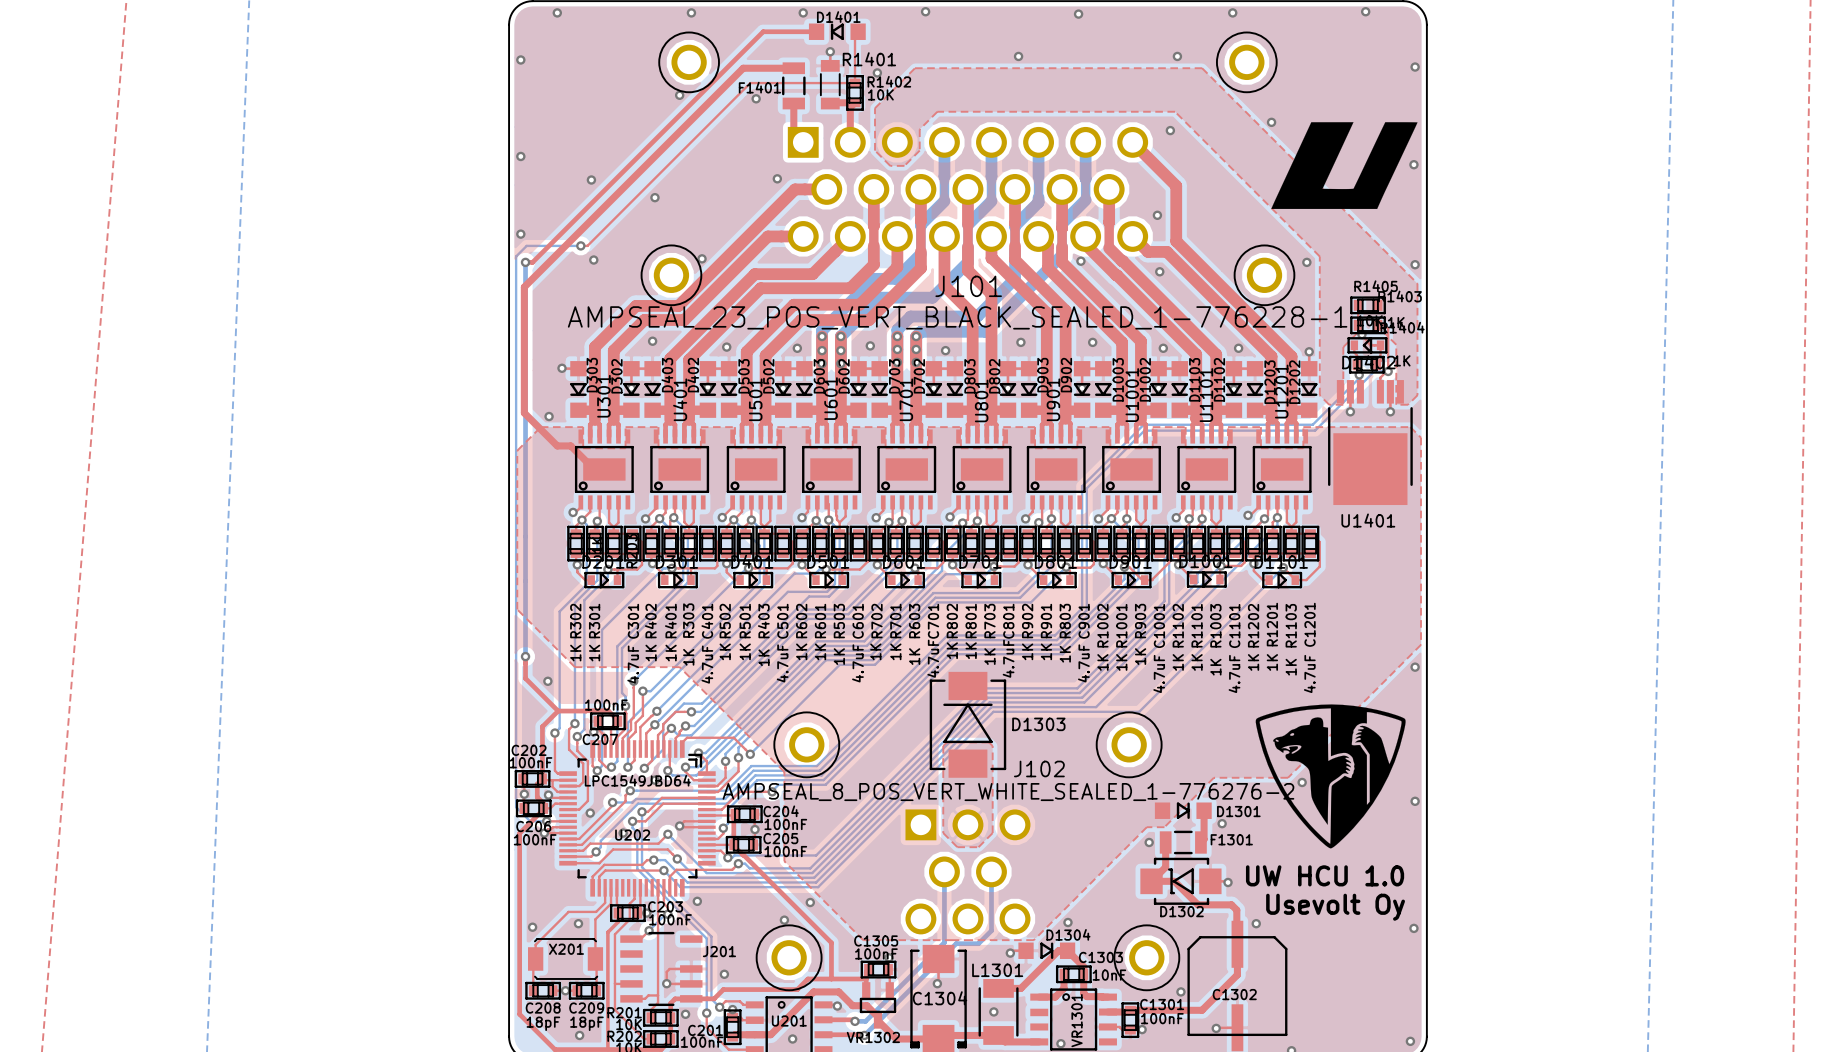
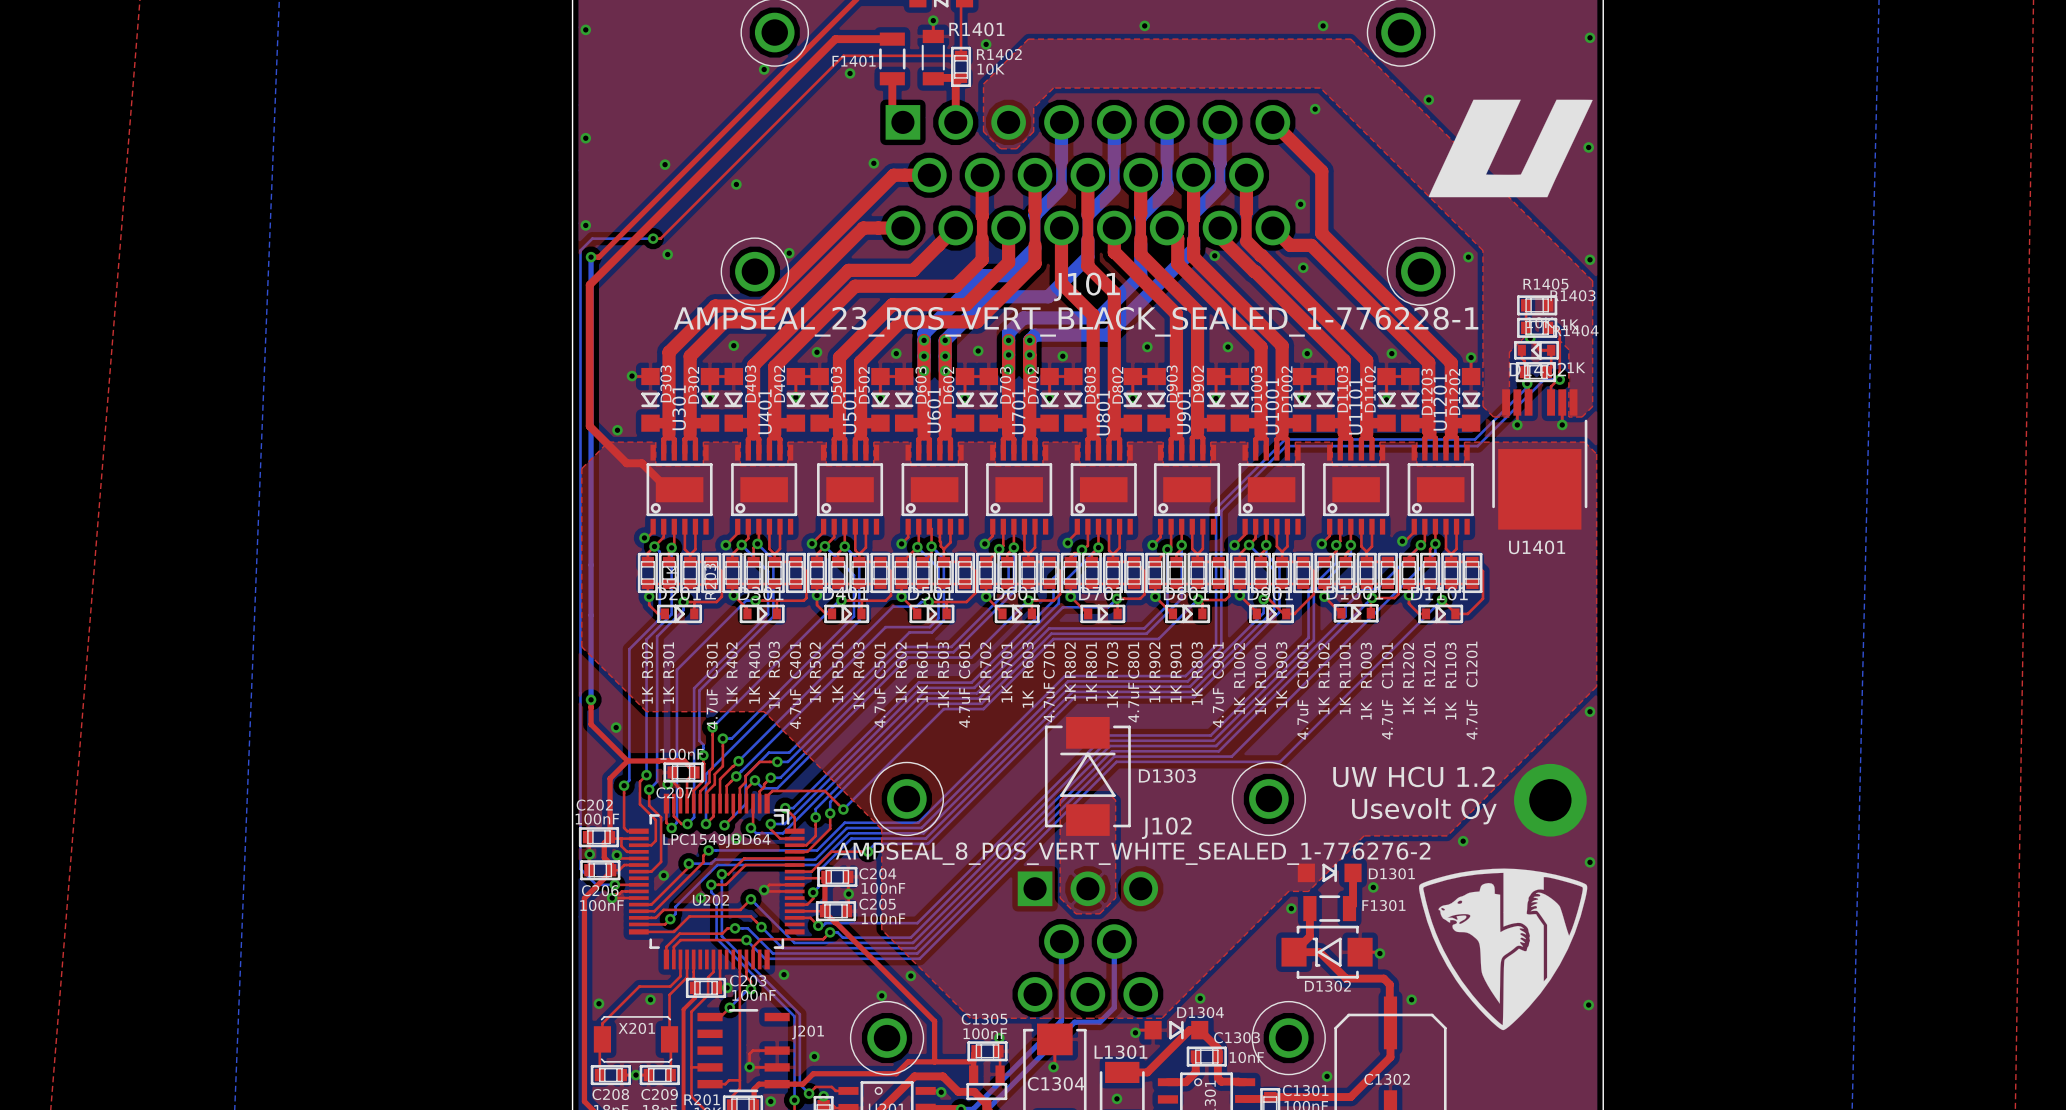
text: none -> UW HCU 1.2 (1414, 776)
part: none -> (1550, 800)
drawing position: (1330, 776) -> (1503, 949)
text: UW HCU 1.0 (1325, 875) -> none
text position: Usevolt Oy (1335, 907) -> Usevolt Oy (1424, 811)

